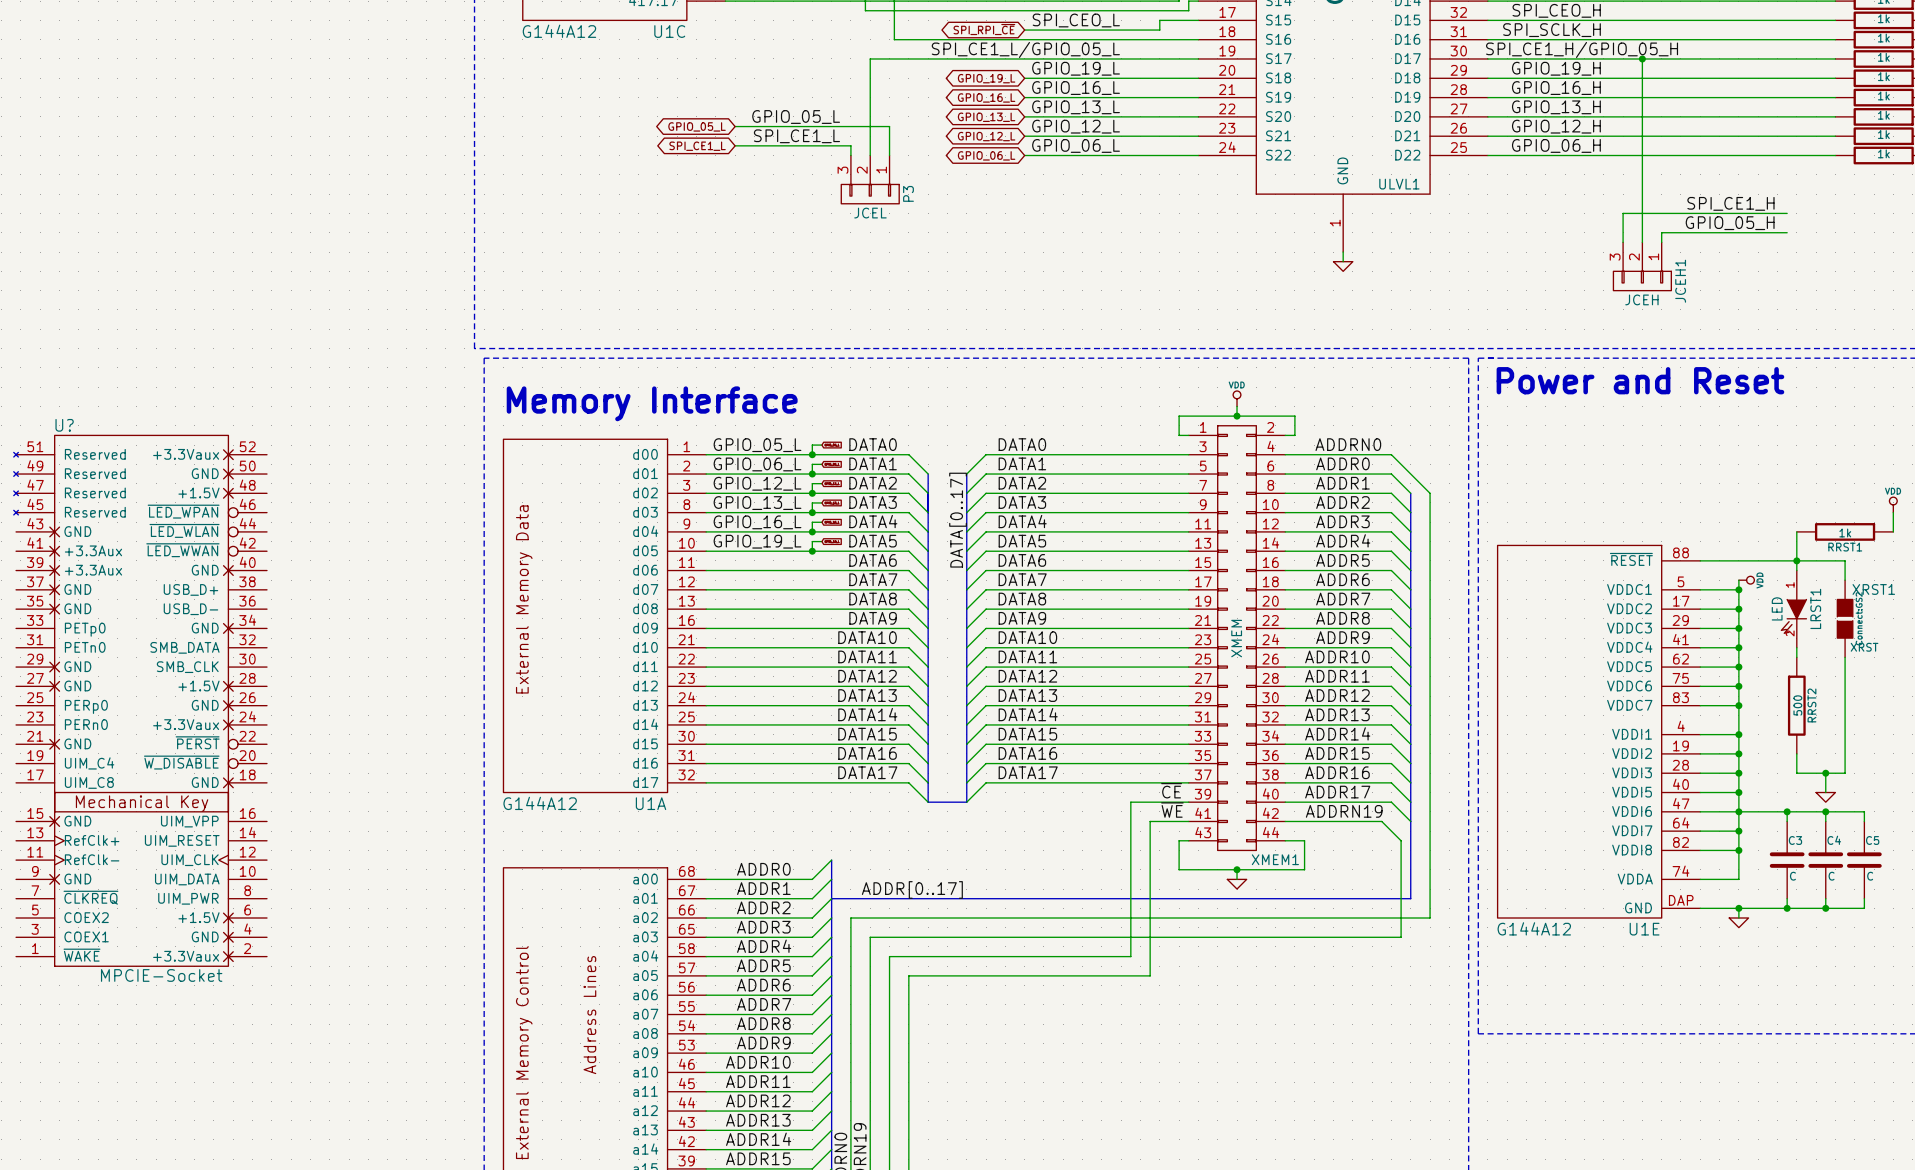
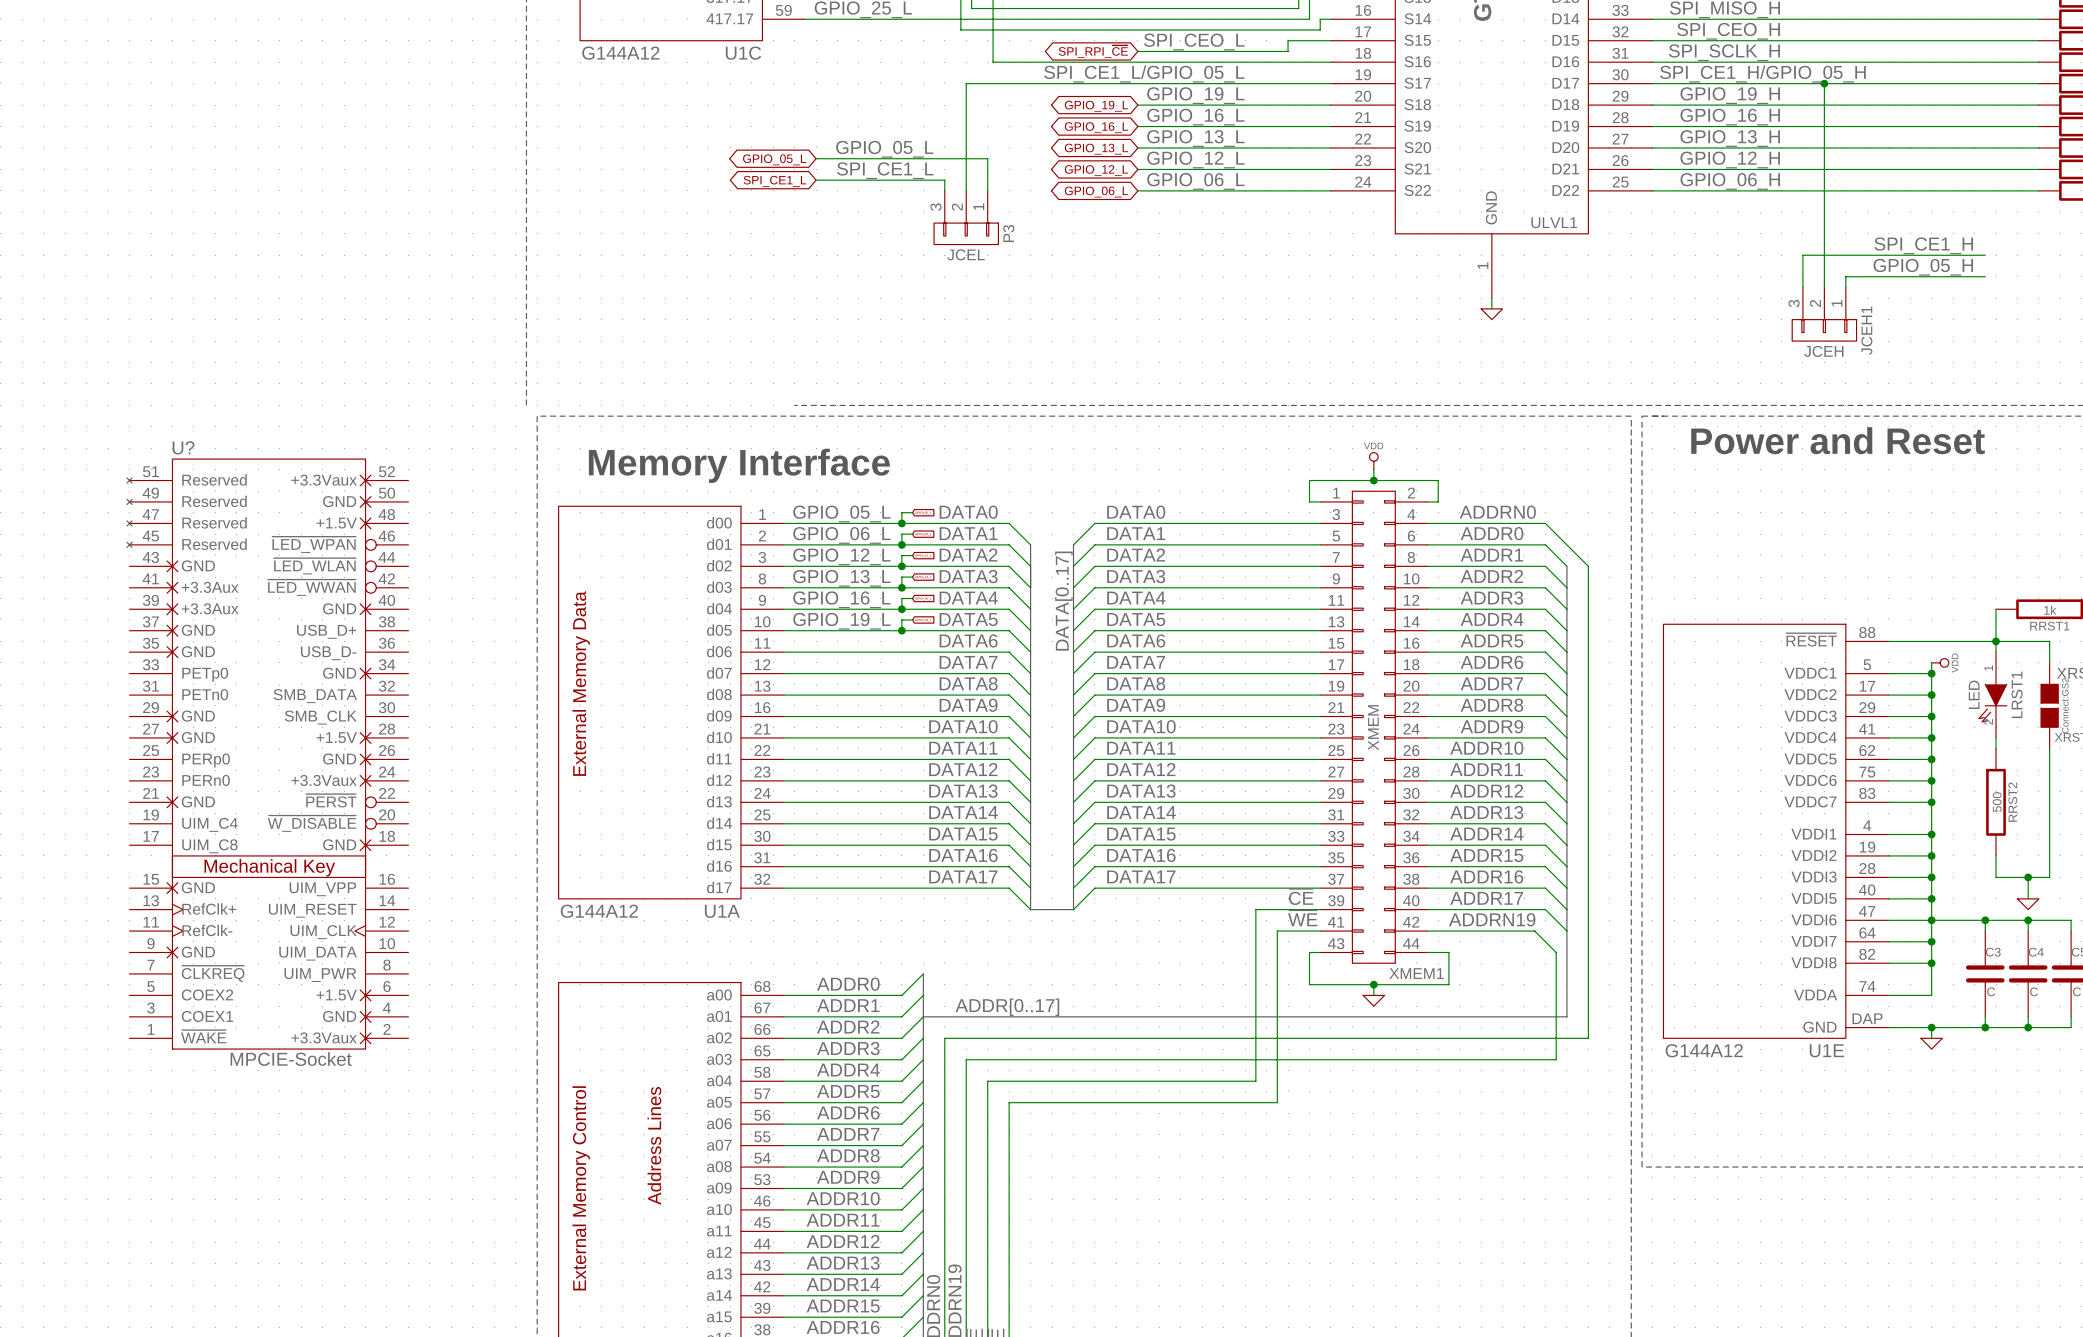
line: (474, 348) (715, 348) -> none
U? position: (140, 700) -> (267, 754)

